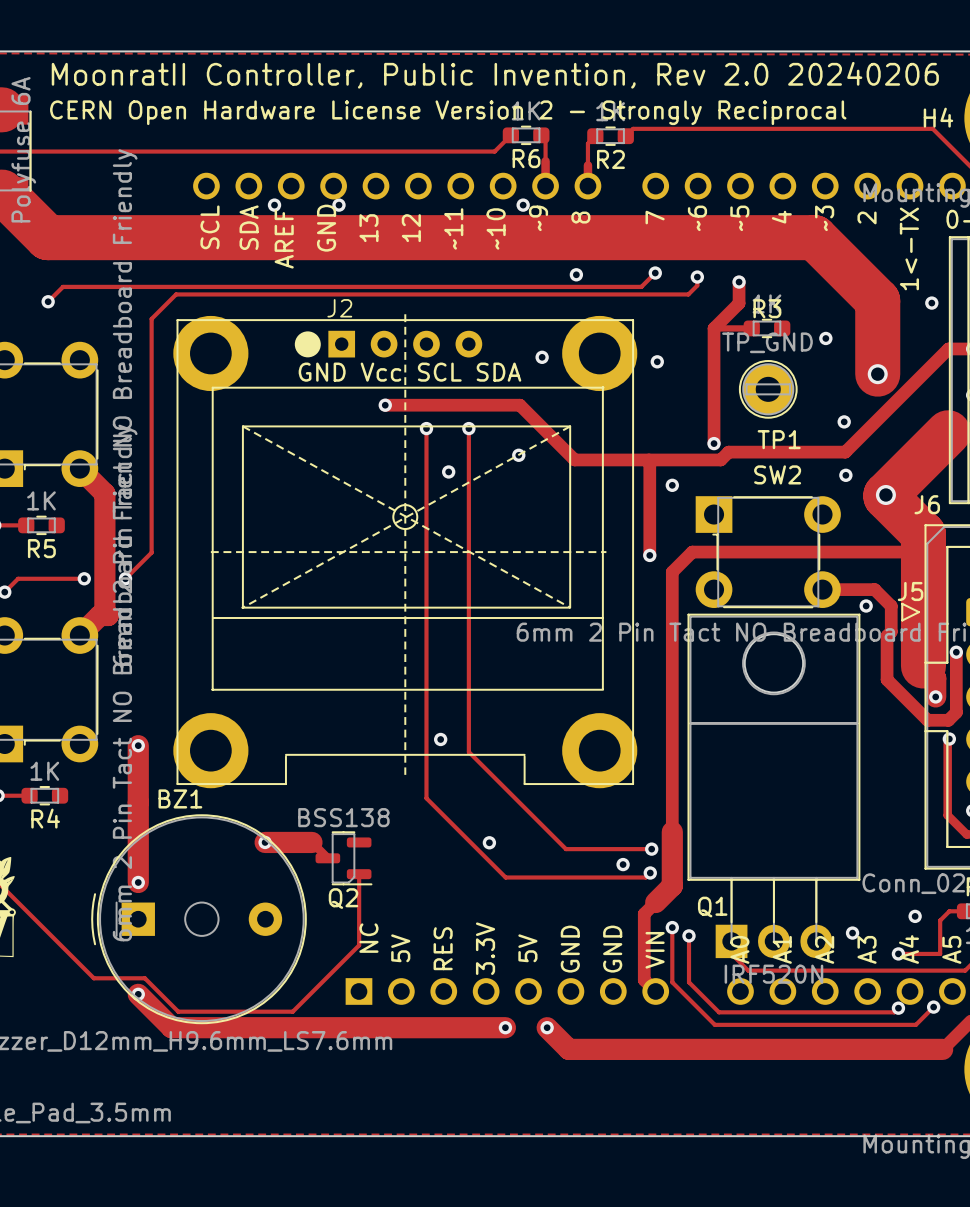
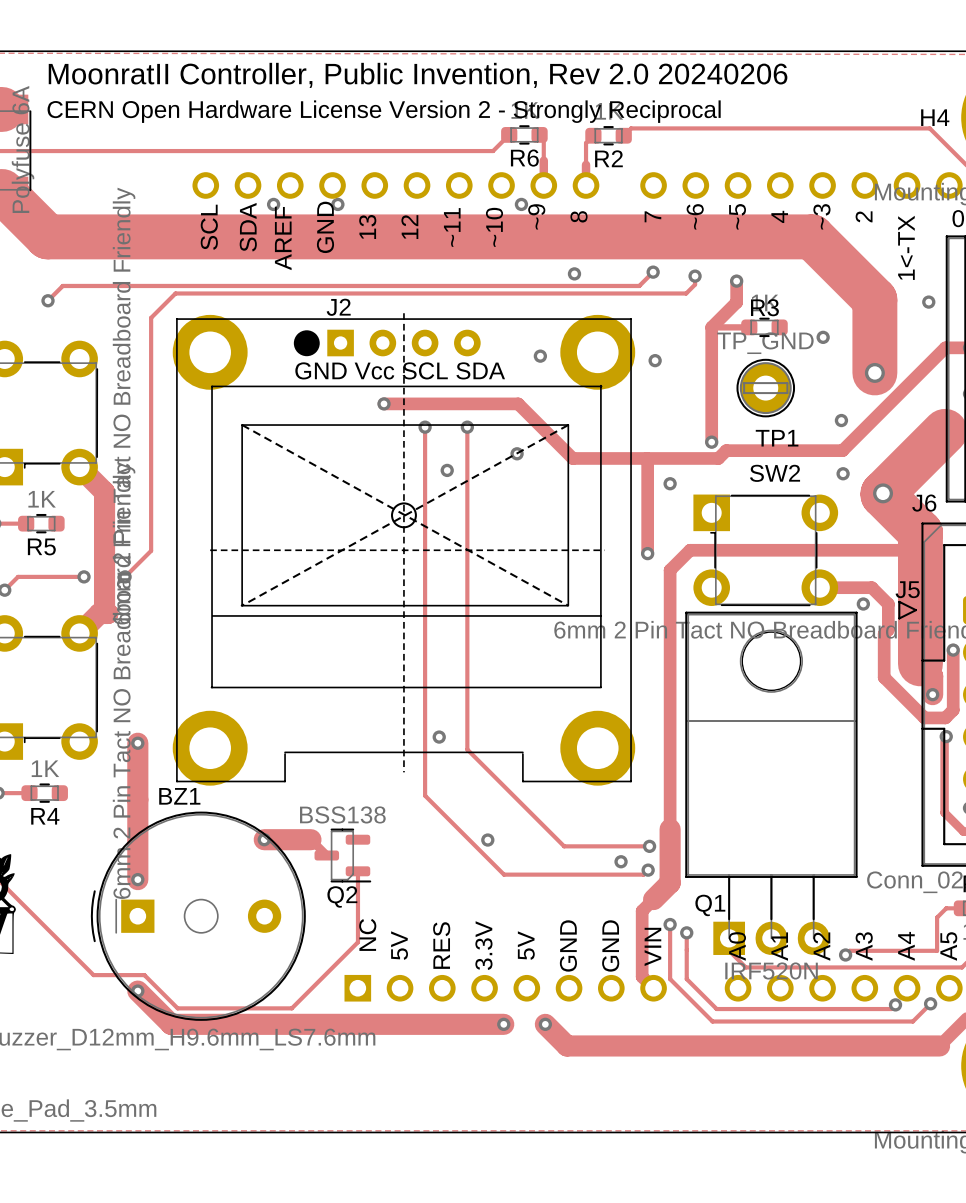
via: (915, 916) -> none
via: (852, 933) -> none
track: none -> (895, 950) (849, 950) (845, 954)
via: (898, 953) -> none
via: none -> (845, 954)

